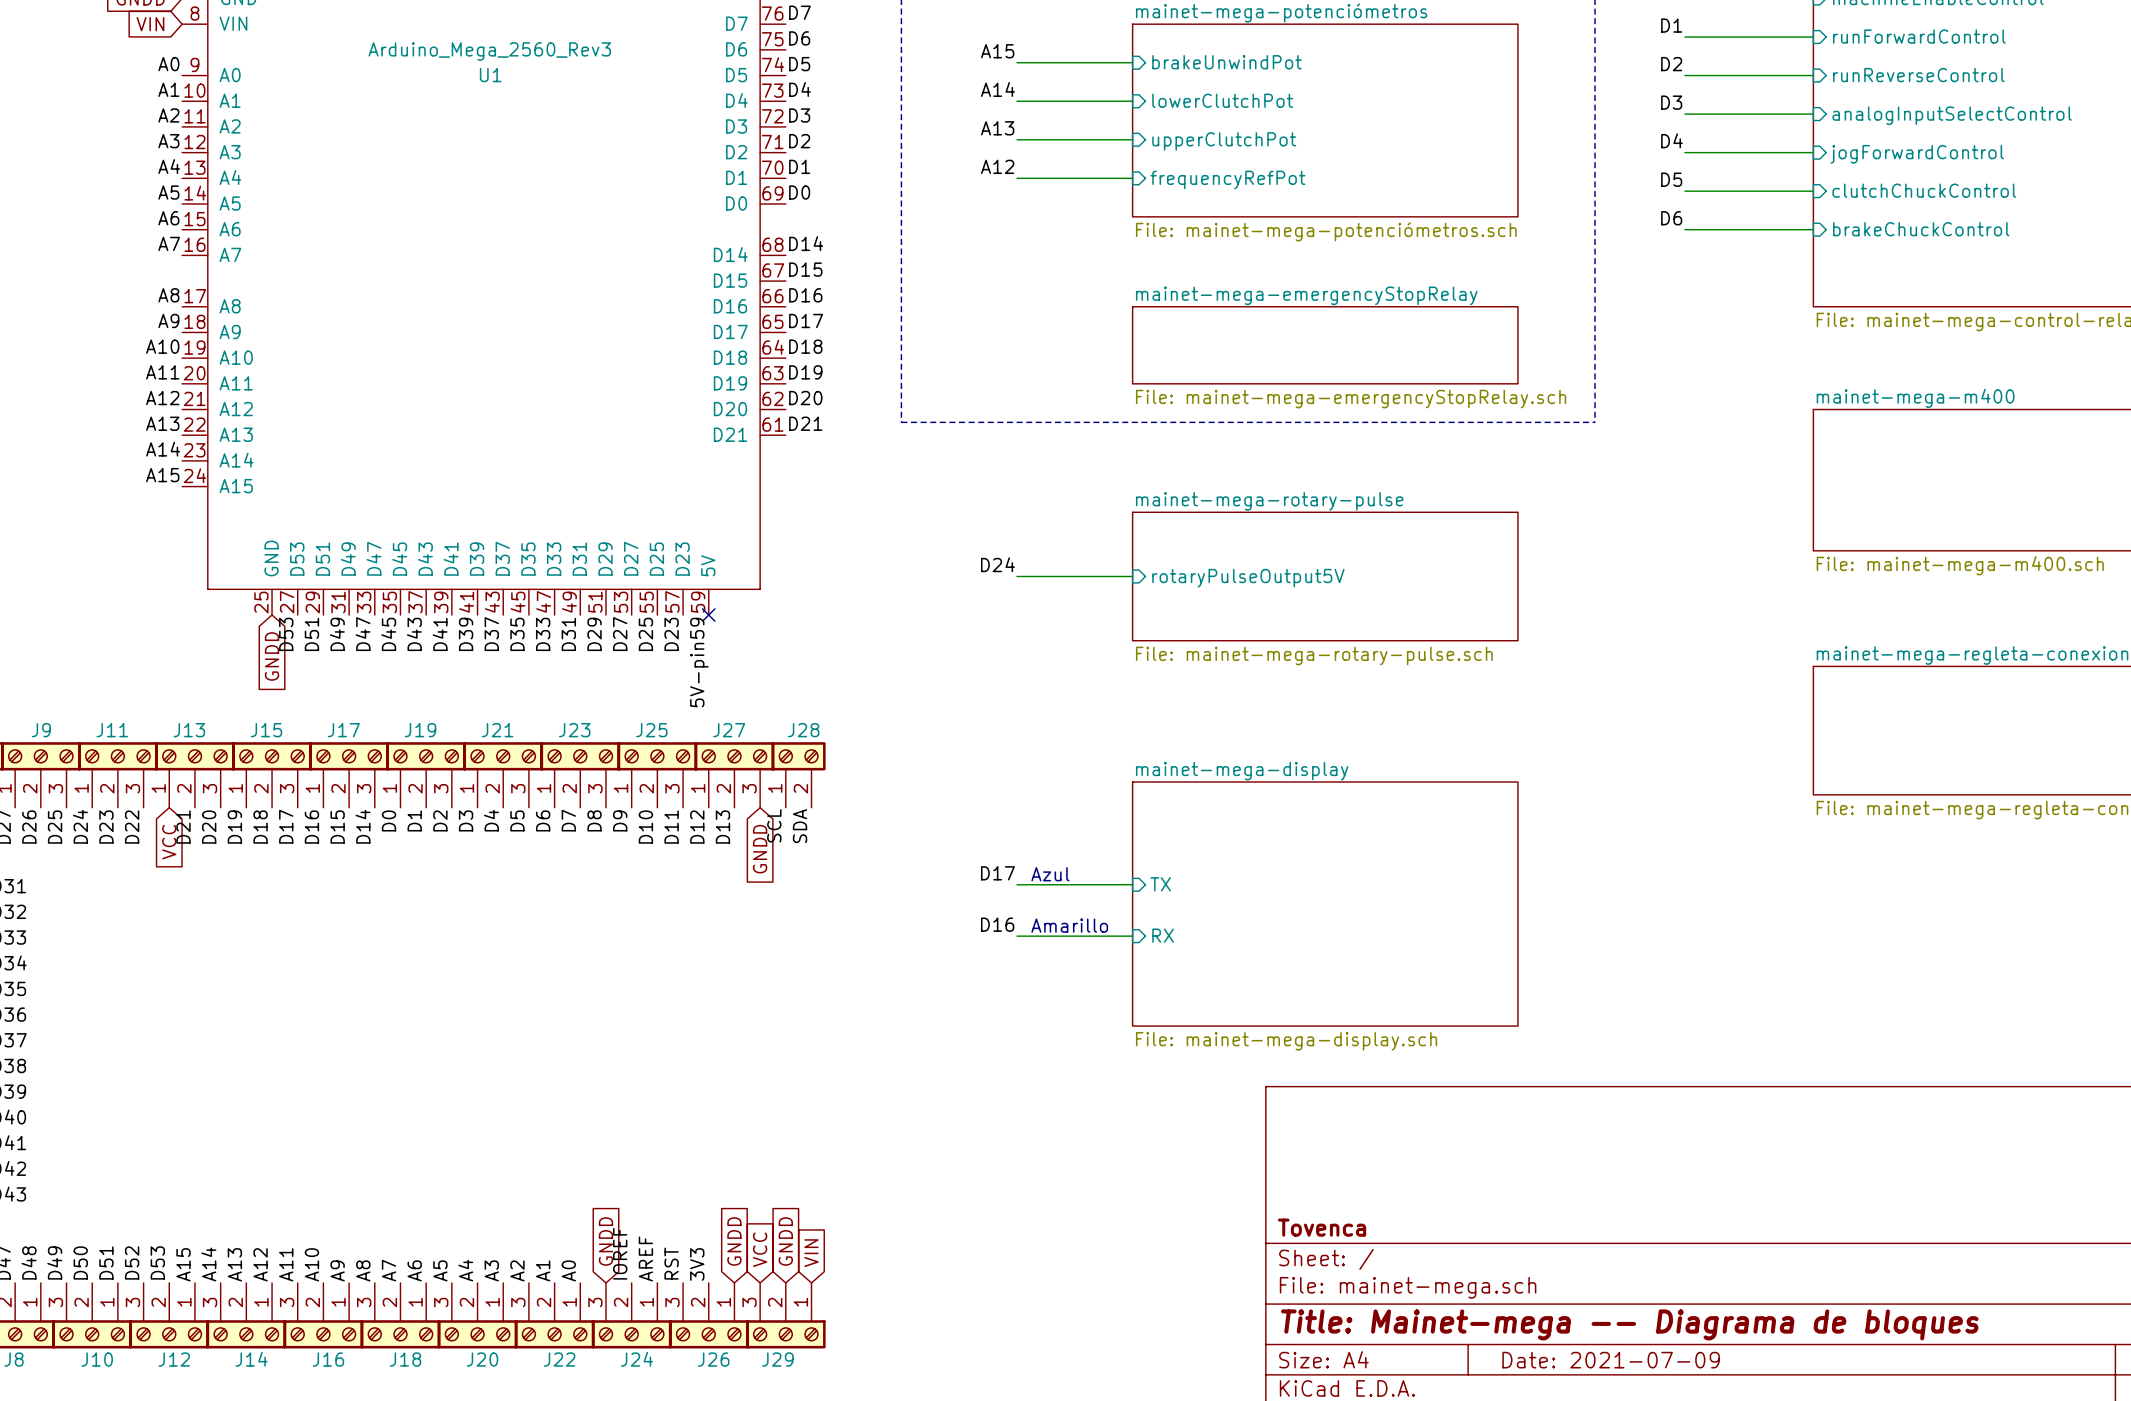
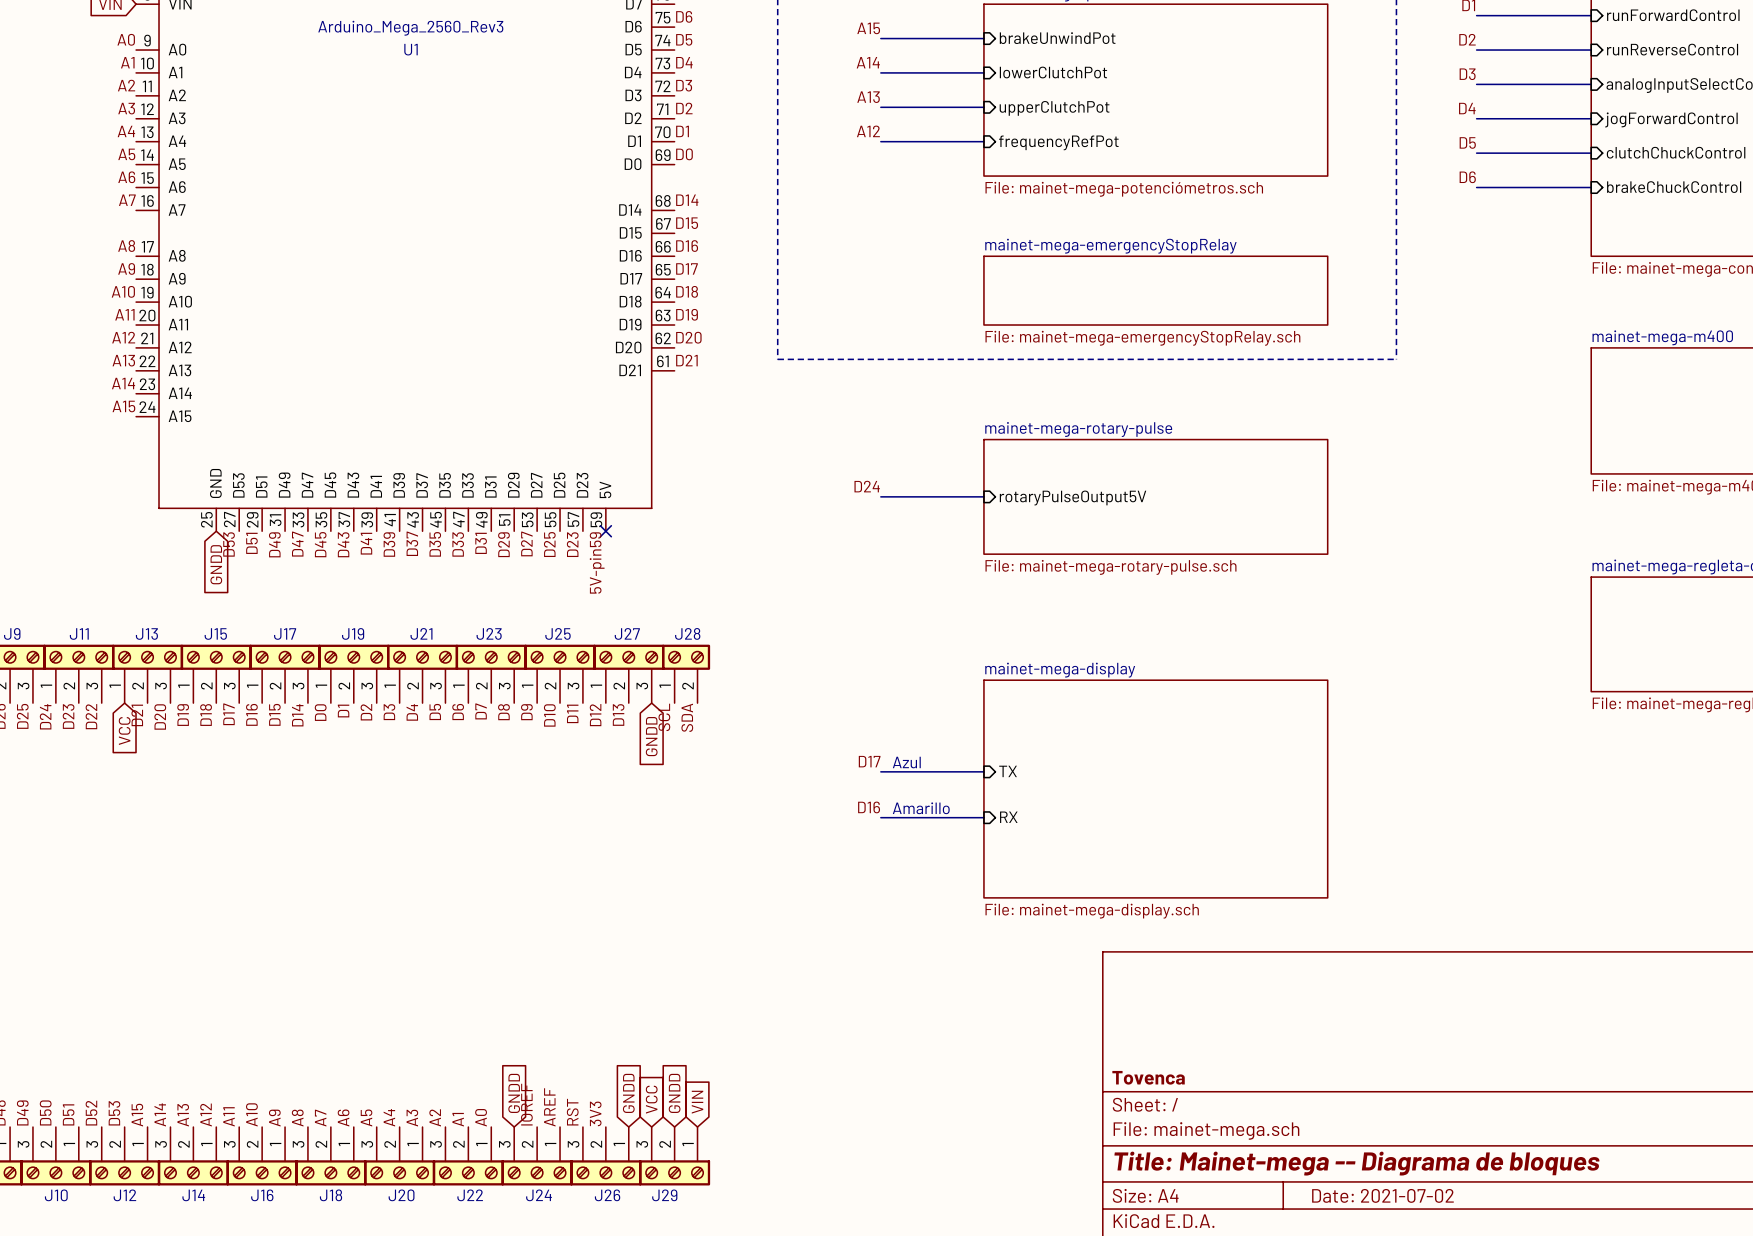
title block: Date: 2021-07-09 (1611, 1360) -> Date: 2021-07-02 (1382, 1195)

